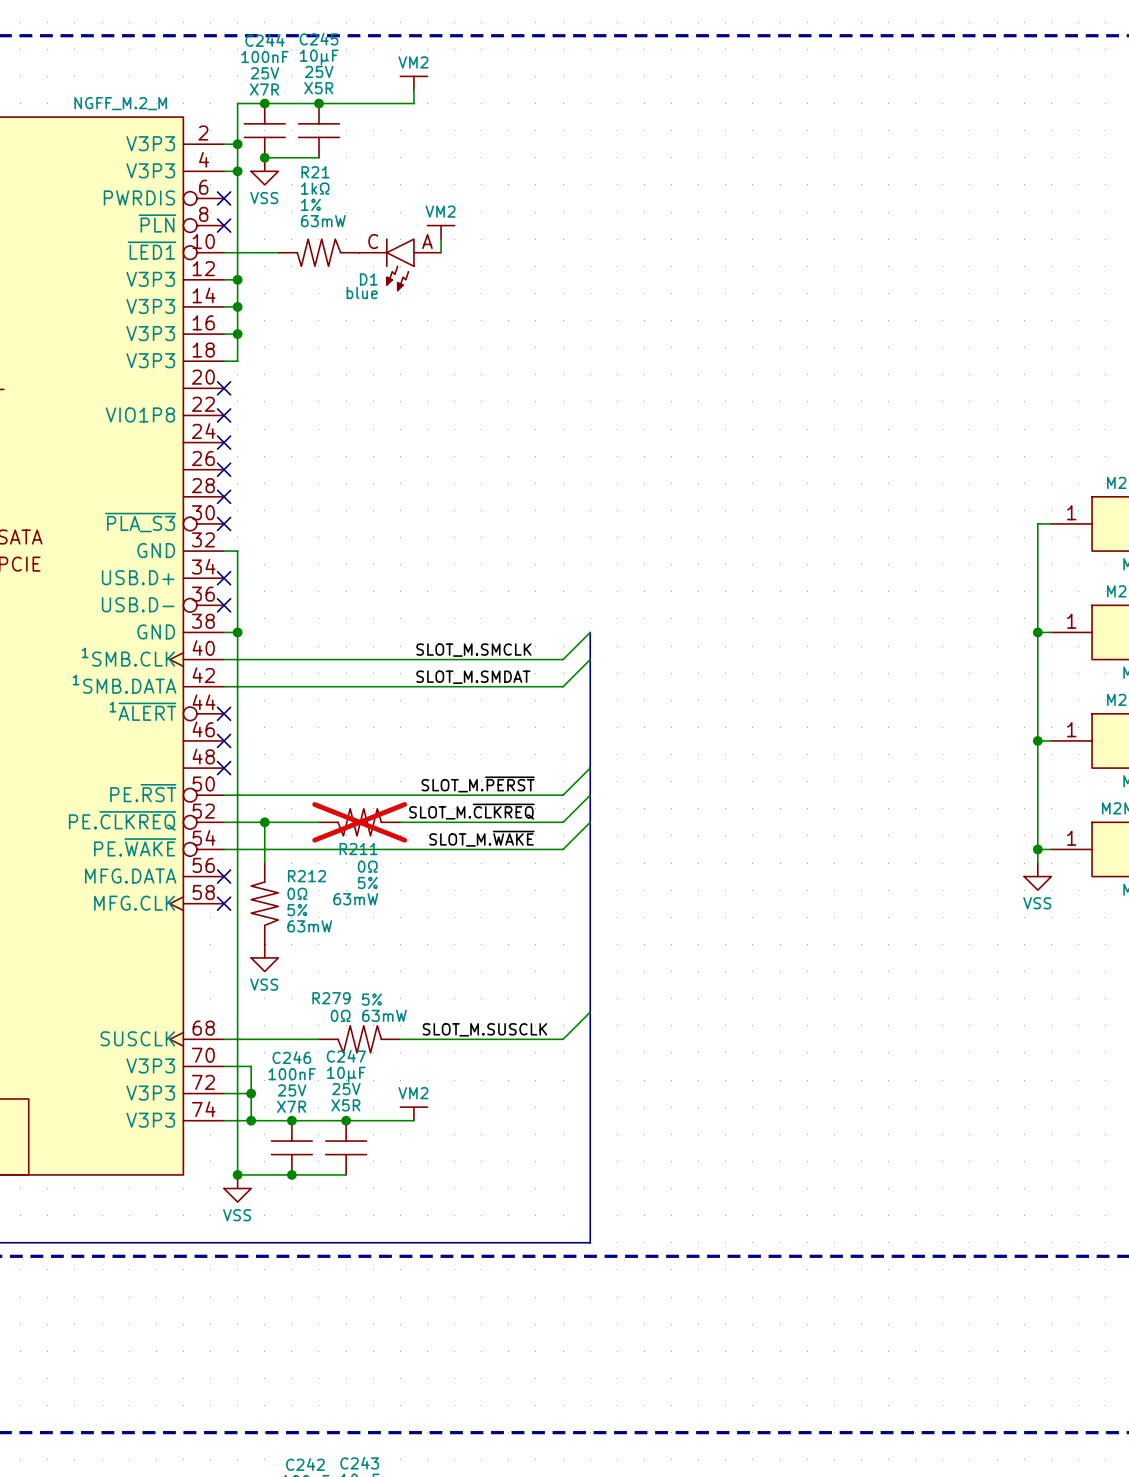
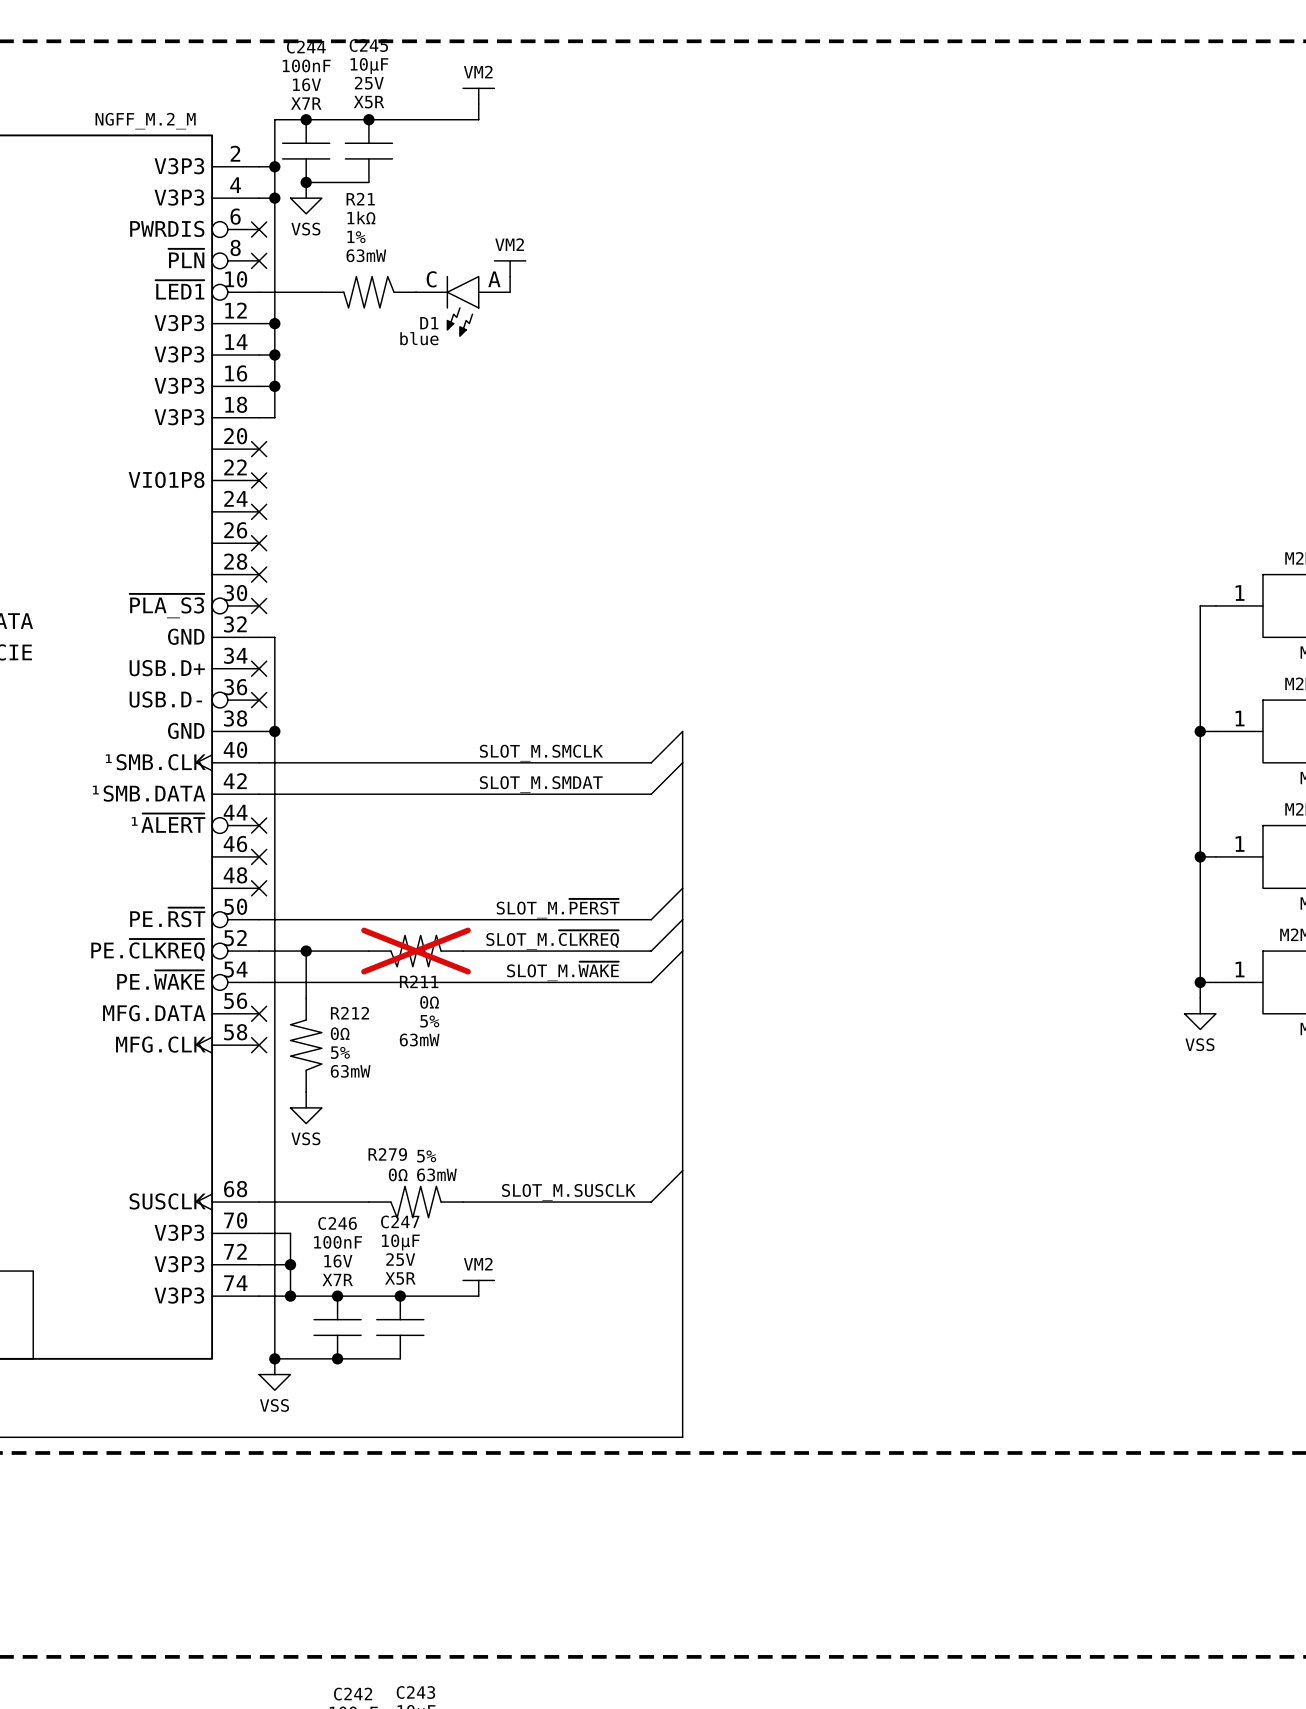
C244 text: 25V (265, 73) -> 16V (306, 84)
C246 text: 25V (292, 1090) -> 16V (338, 1261)

